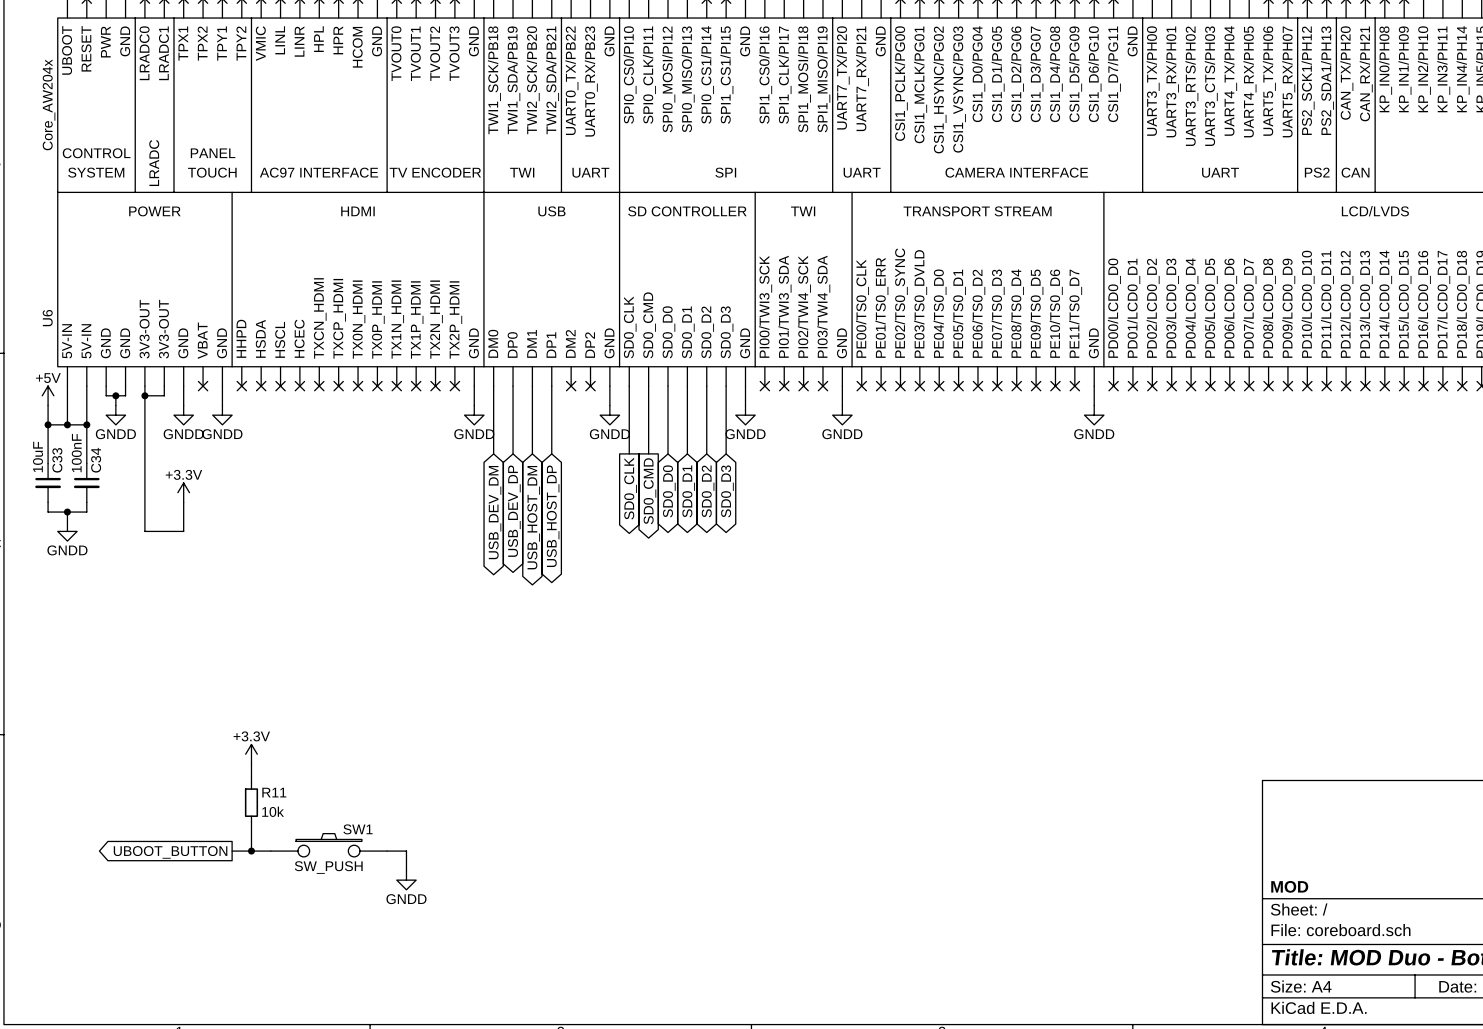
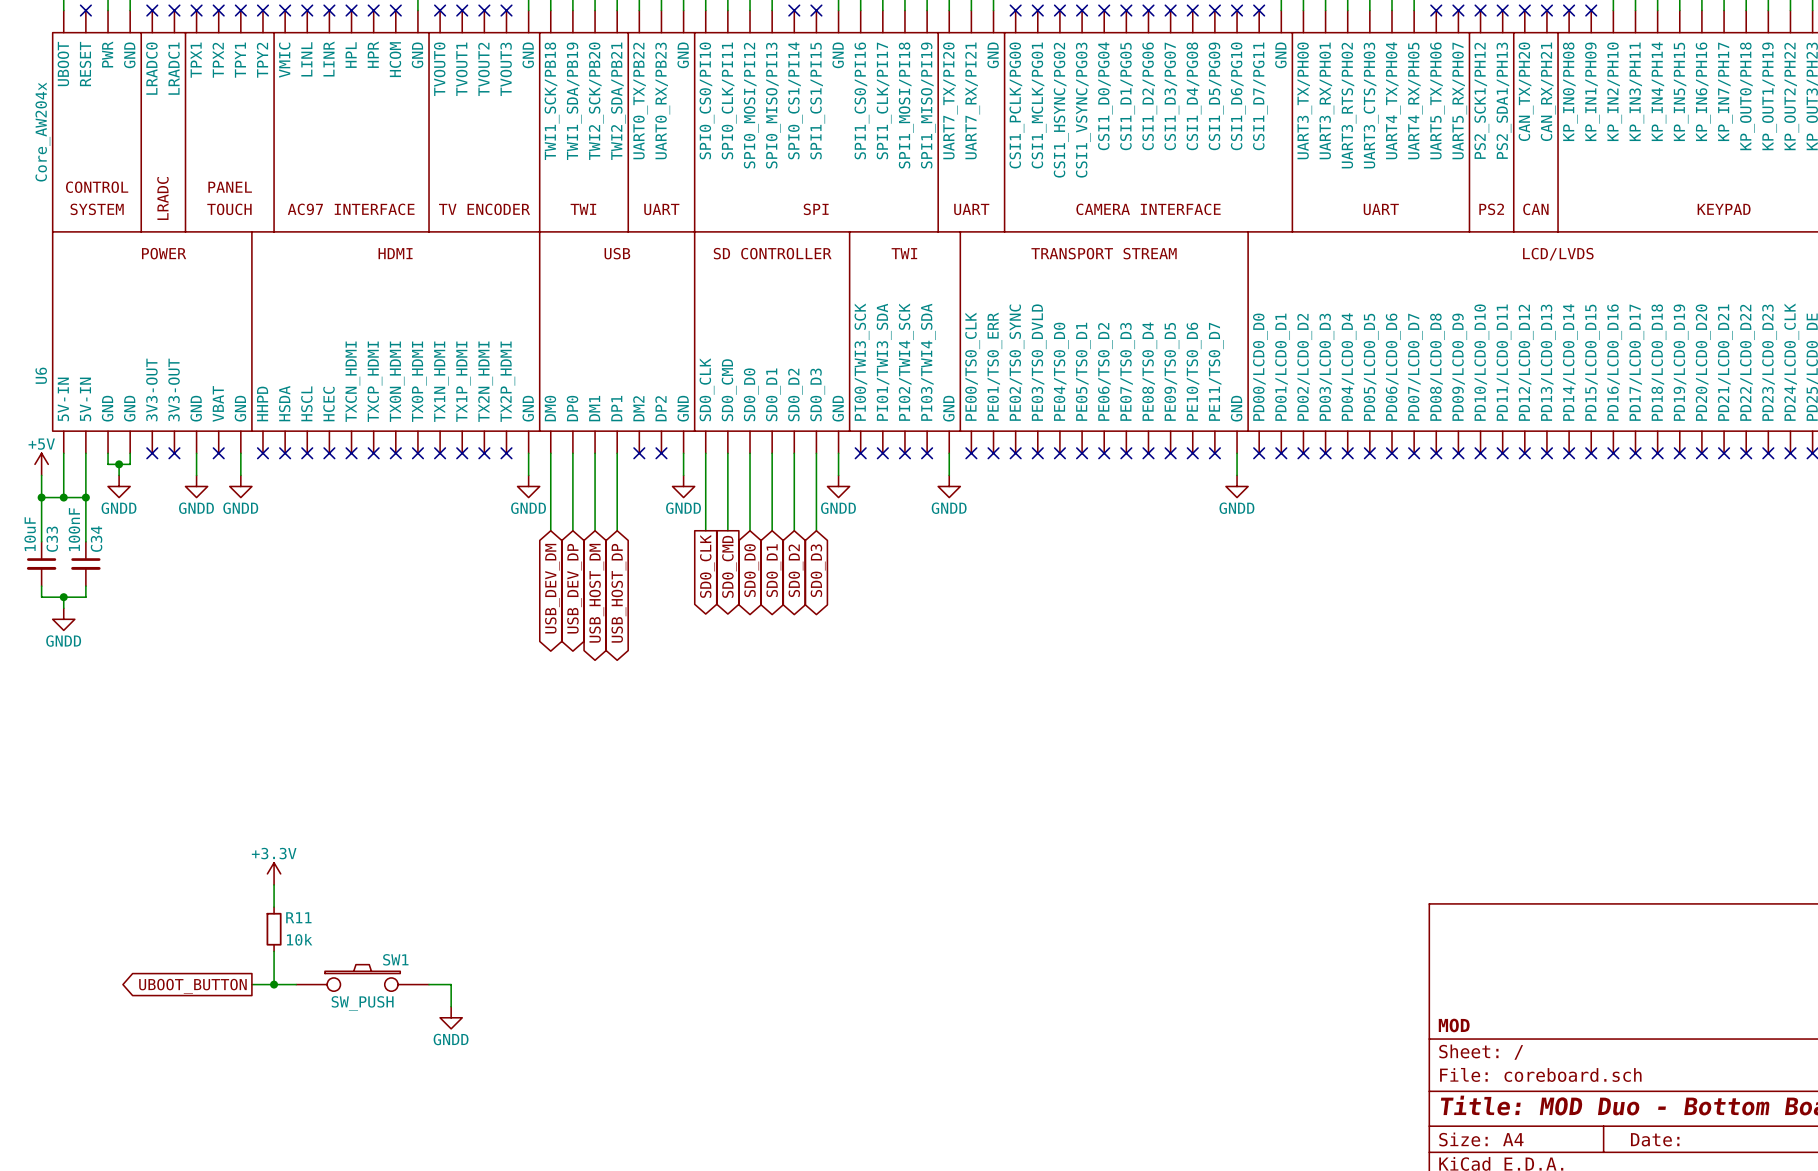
wire: (144, 386) (144, 531) (183, 531) (183, 502) -> none
no-connect mark: none -> (152, 453)
wire: (164, 386) (164, 395) (144, 395) -> none
no-connect mark: none -> (174, 453)
junction: (144, 395) -> none
power symbol: +3.3V (183, 492) -> none

